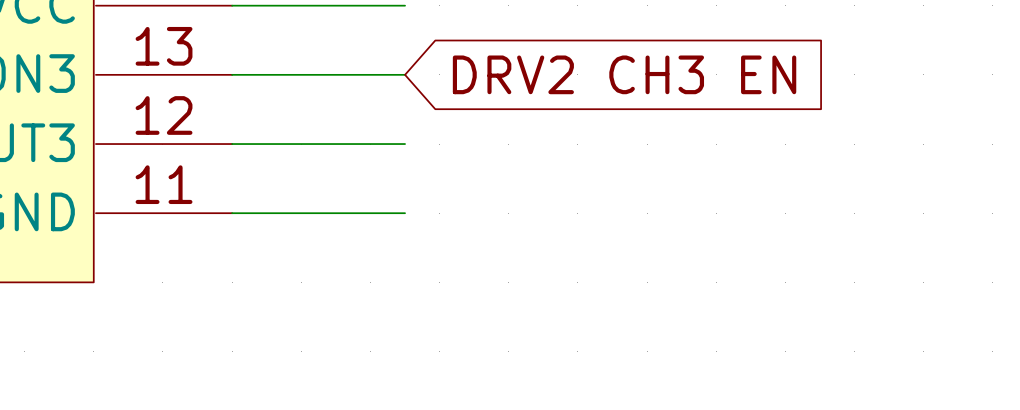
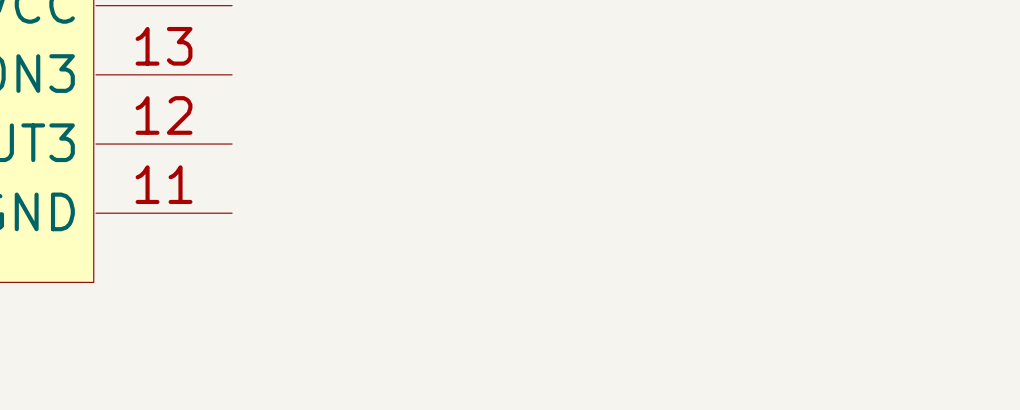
wire: (232, 5) (405, 5) -> none
wire: (232, 74) (405, 74) -> none
global label: DRV2 CH3 EN (624, 74) -> none
wire: (232, 144) (405, 144) -> none
wire: (232, 213) (405, 213) -> none

